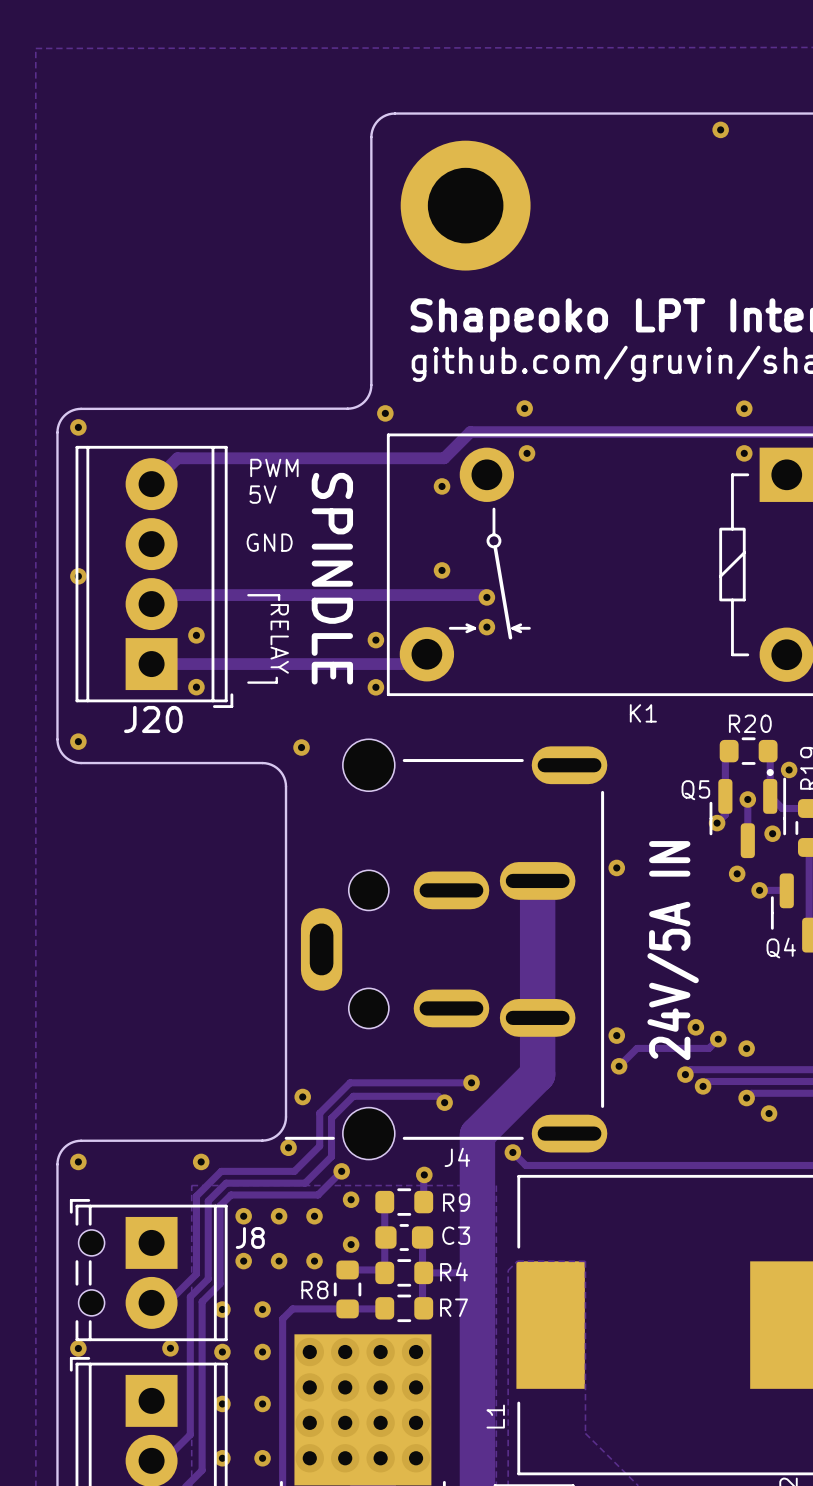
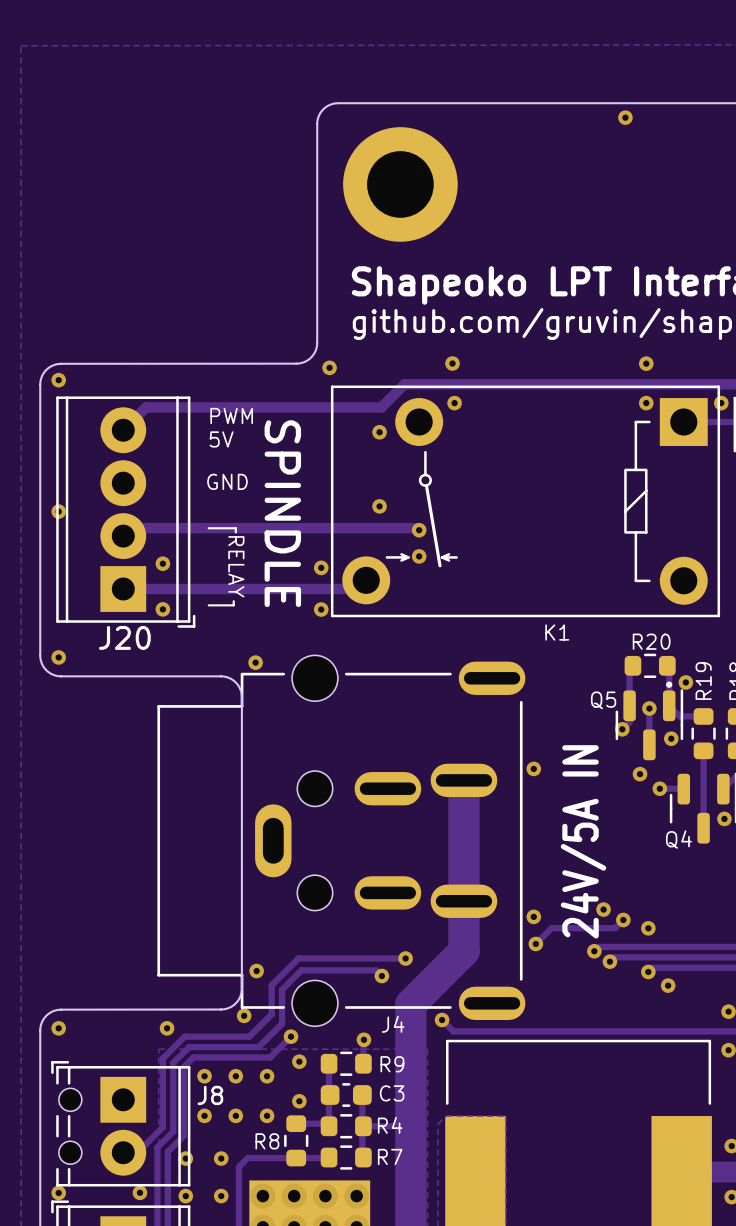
J4 footprint: [284, 739, 608, 1160] -> [157, 655, 526, 1027]

